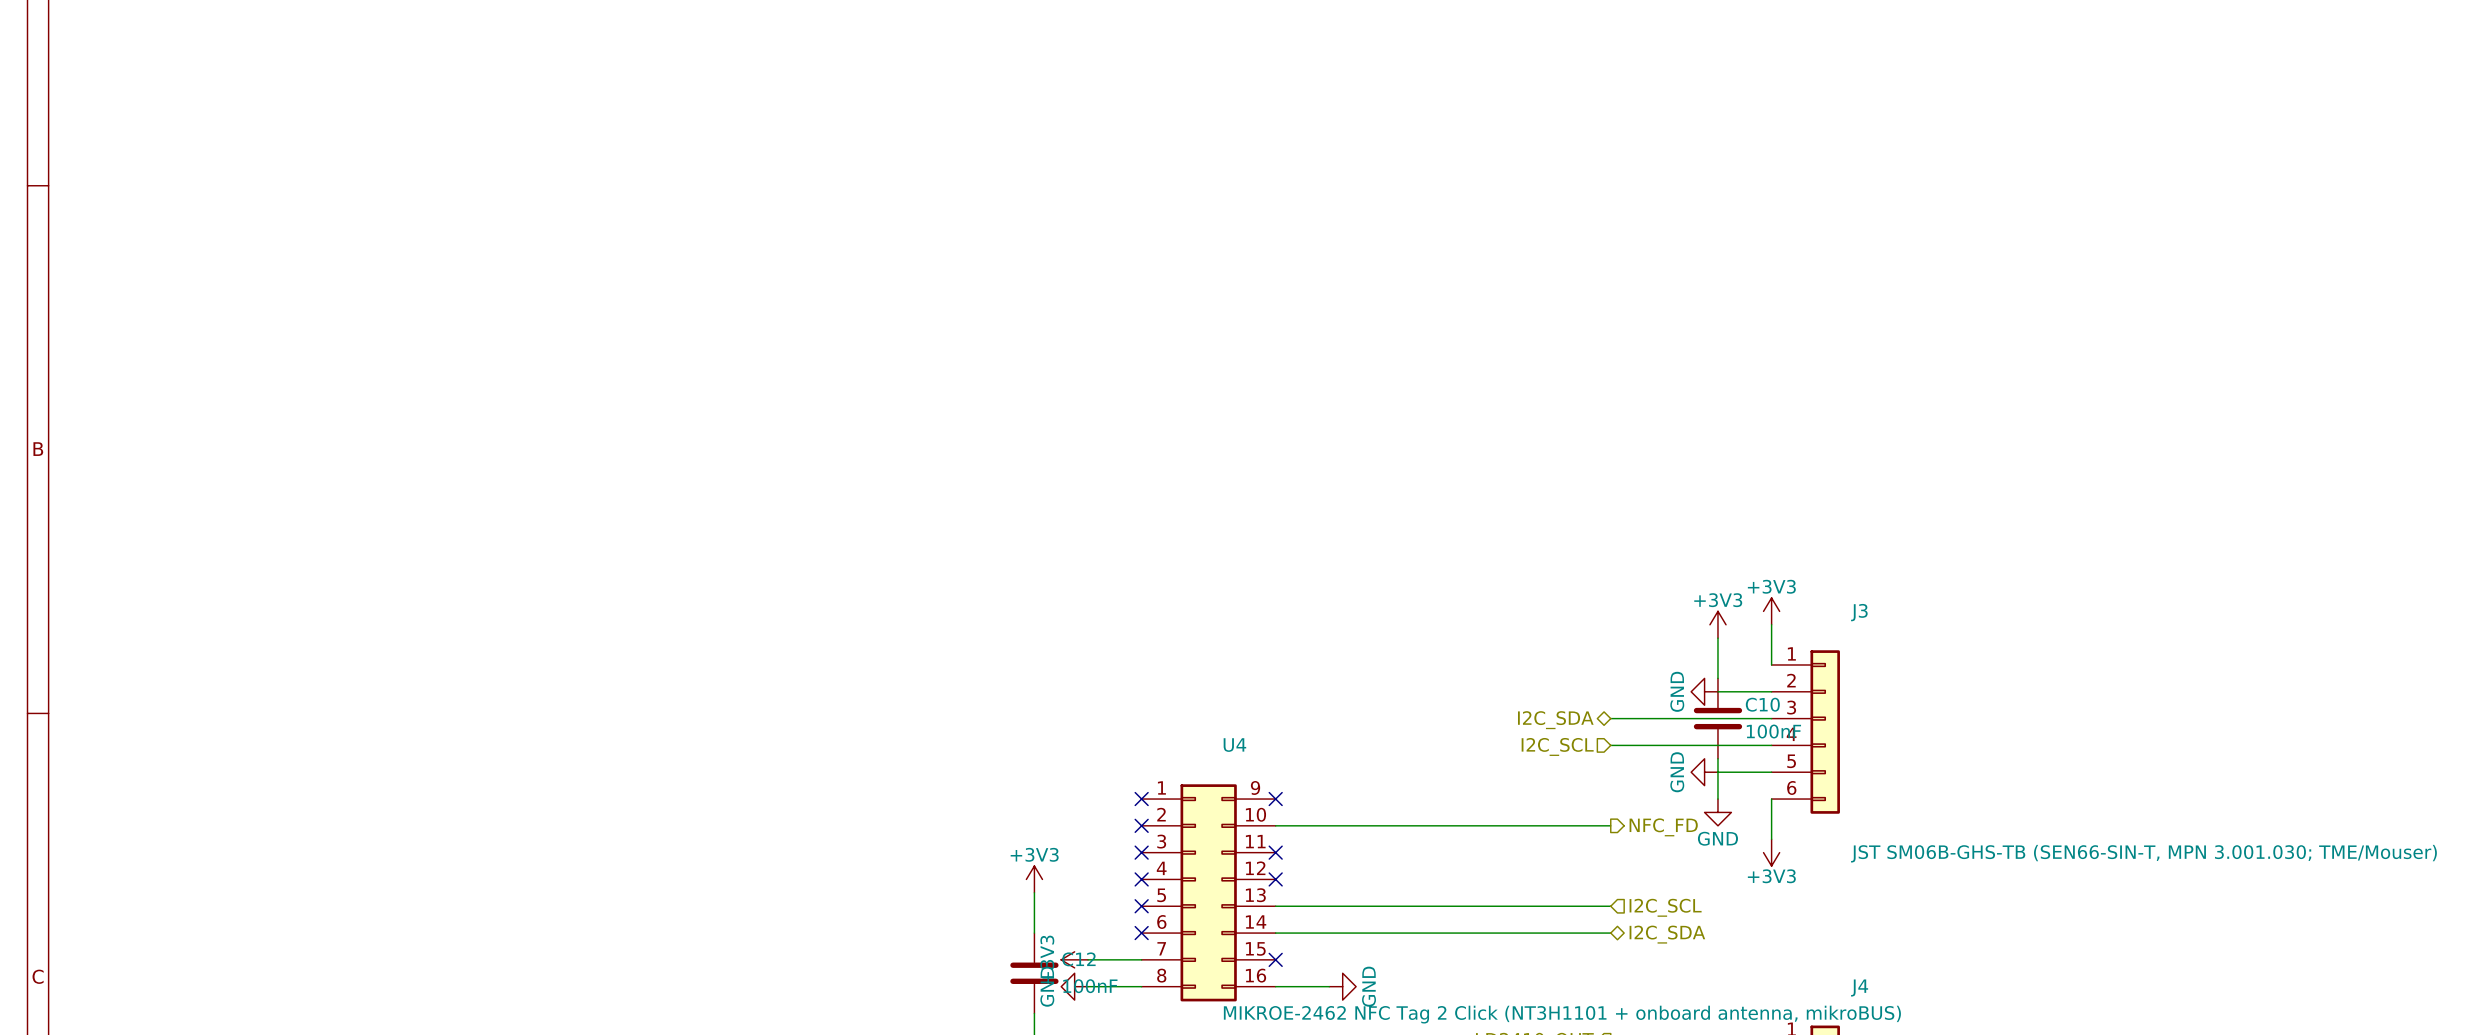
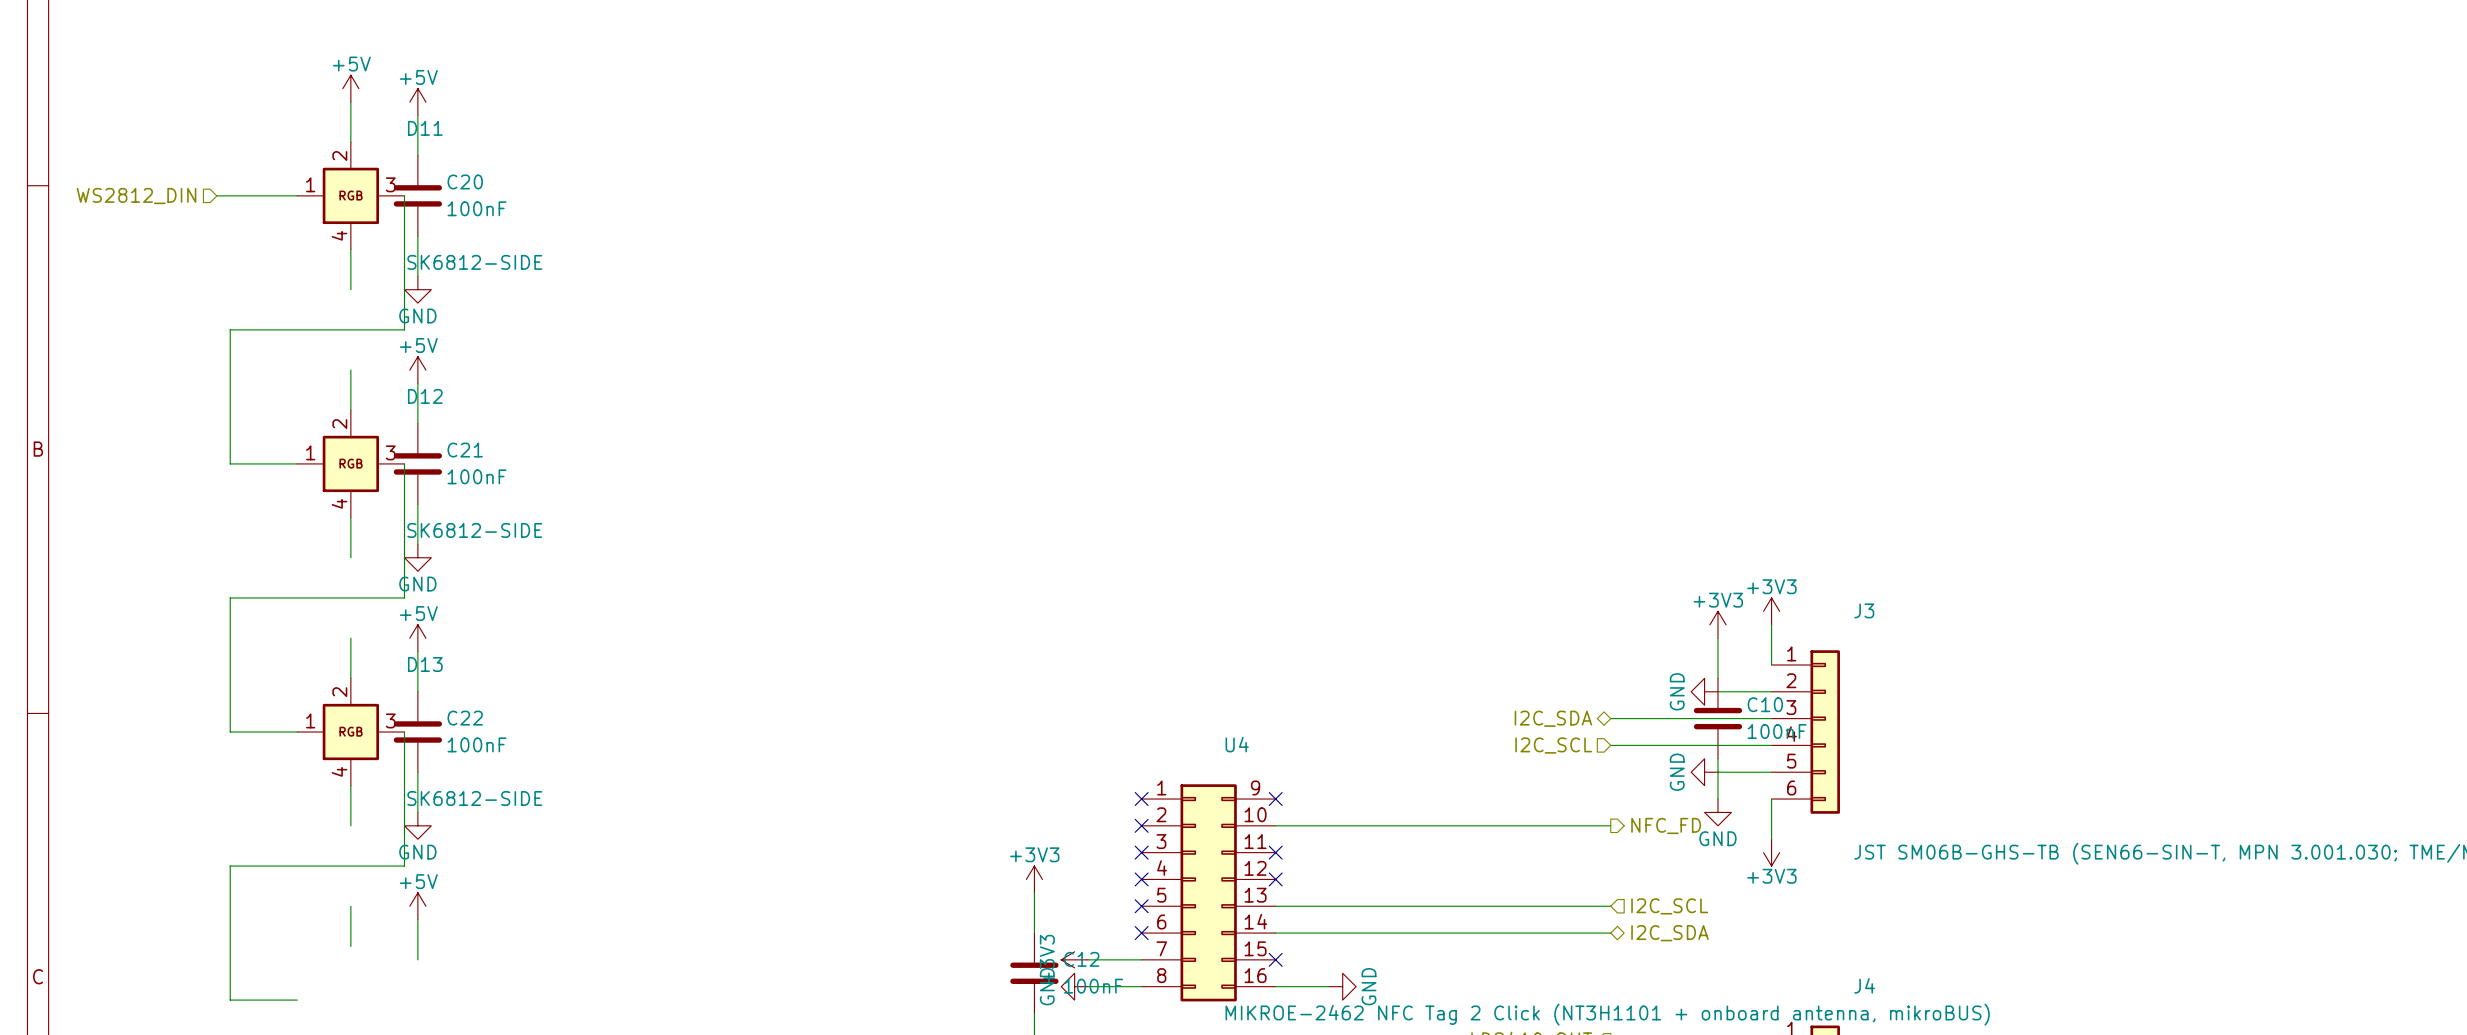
power symbol: none -> +5V (350, 88)
wire: none -> (350, 102) (350, 142)
power symbol: none -> +5V (417, 102)
wire: none -> (417, 115) (417, 155)
wire: none -> (216, 195) (297, 195)
D11: none -> SK6812-SIDE (350, 195)
wire: none -> (404, 195) (404, 329) (230, 329) (230, 463) (297, 463)
C20: none -> 100nF (417, 195)
hierarchical label: none -> WS2812_DIN (136, 196)
wire: none -> (417, 236) (417, 276)
wire: none -> (350, 249) (350, 289)
power symbol: none -> GND (417, 289)
wire: none -> (350, 370) (350, 410)
power symbol: none -> +5V (417, 370)
wire: none -> (417, 383) (417, 423)
D12: none -> SK6812-SIDE (350, 463)
wire: none -> (404, 463) (404, 597) (230, 597) (230, 732) (297, 732)
C21: none -> 100nF (417, 463)
wire: none -> (417, 504) (417, 544)
wire: none -> (350, 517) (350, 557)
power symbol: none -> GND (417, 557)
wire: none -> (350, 638) (350, 678)
power symbol: none -> +5V (417, 638)
wire: none -> (417, 651) (417, 691)
D13: none -> SK6812-SIDE (350, 732)
wire: none -> (404, 732) (404, 866) (230, 866) (230, 1000) (297, 1000)
C22: none -> 100nF (417, 732)
wire: none -> (417, 772) (417, 812)
wire: none -> (350, 785) (350, 825)
power symbol: none -> GND (417, 825)
wire: none -> (350, 906) (350, 946)
power symbol: none -> +5V (417, 906)
wire: none -> (417, 919) (417, 959)

